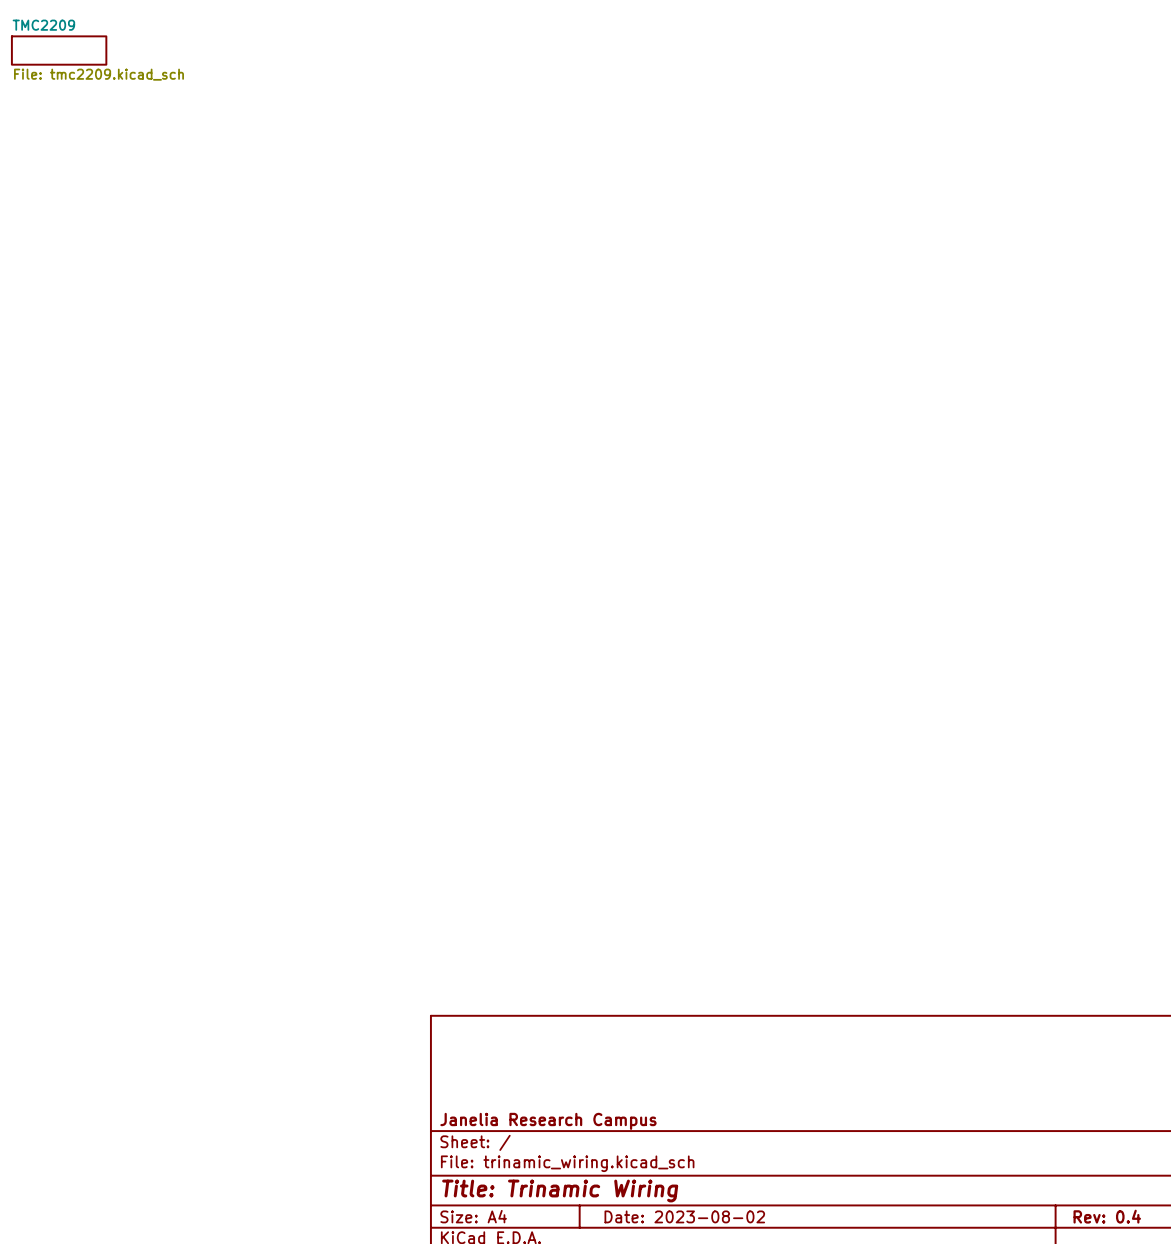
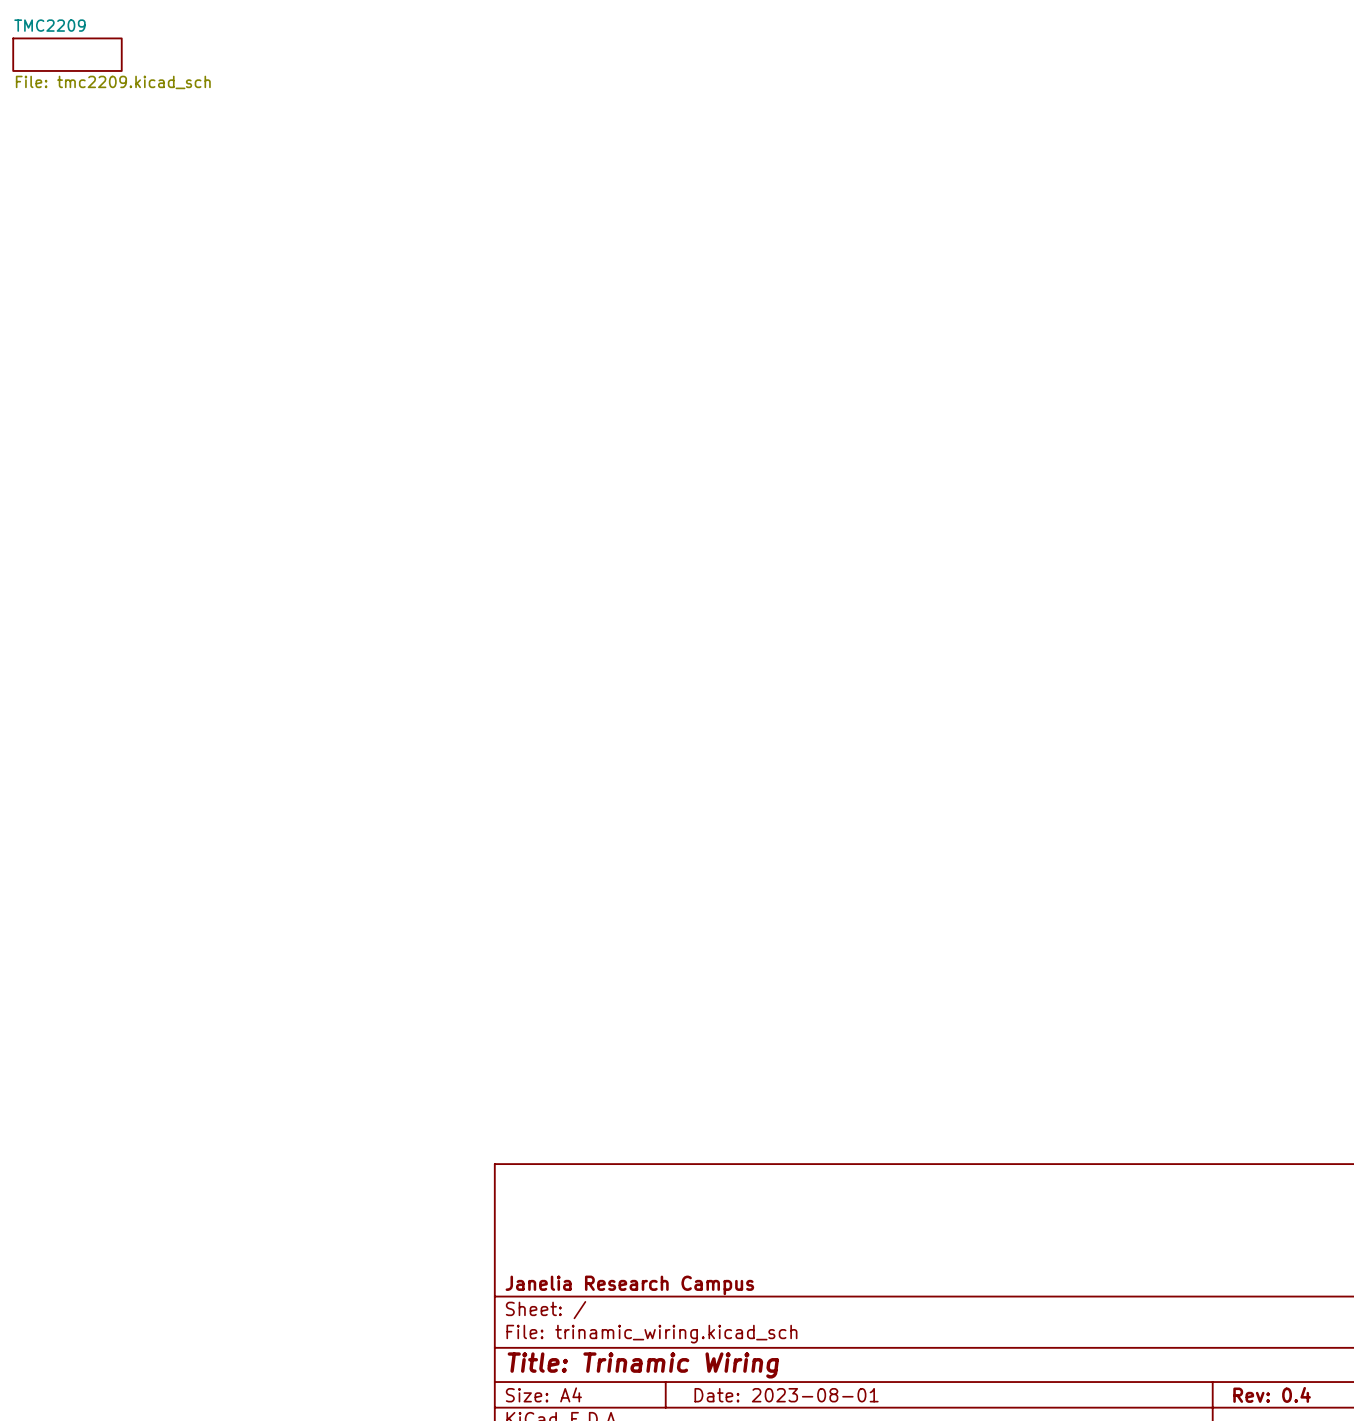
title block: Date: 2023-08-02 (684, 1216) -> Date: 2023-08-01 (786, 1395)

